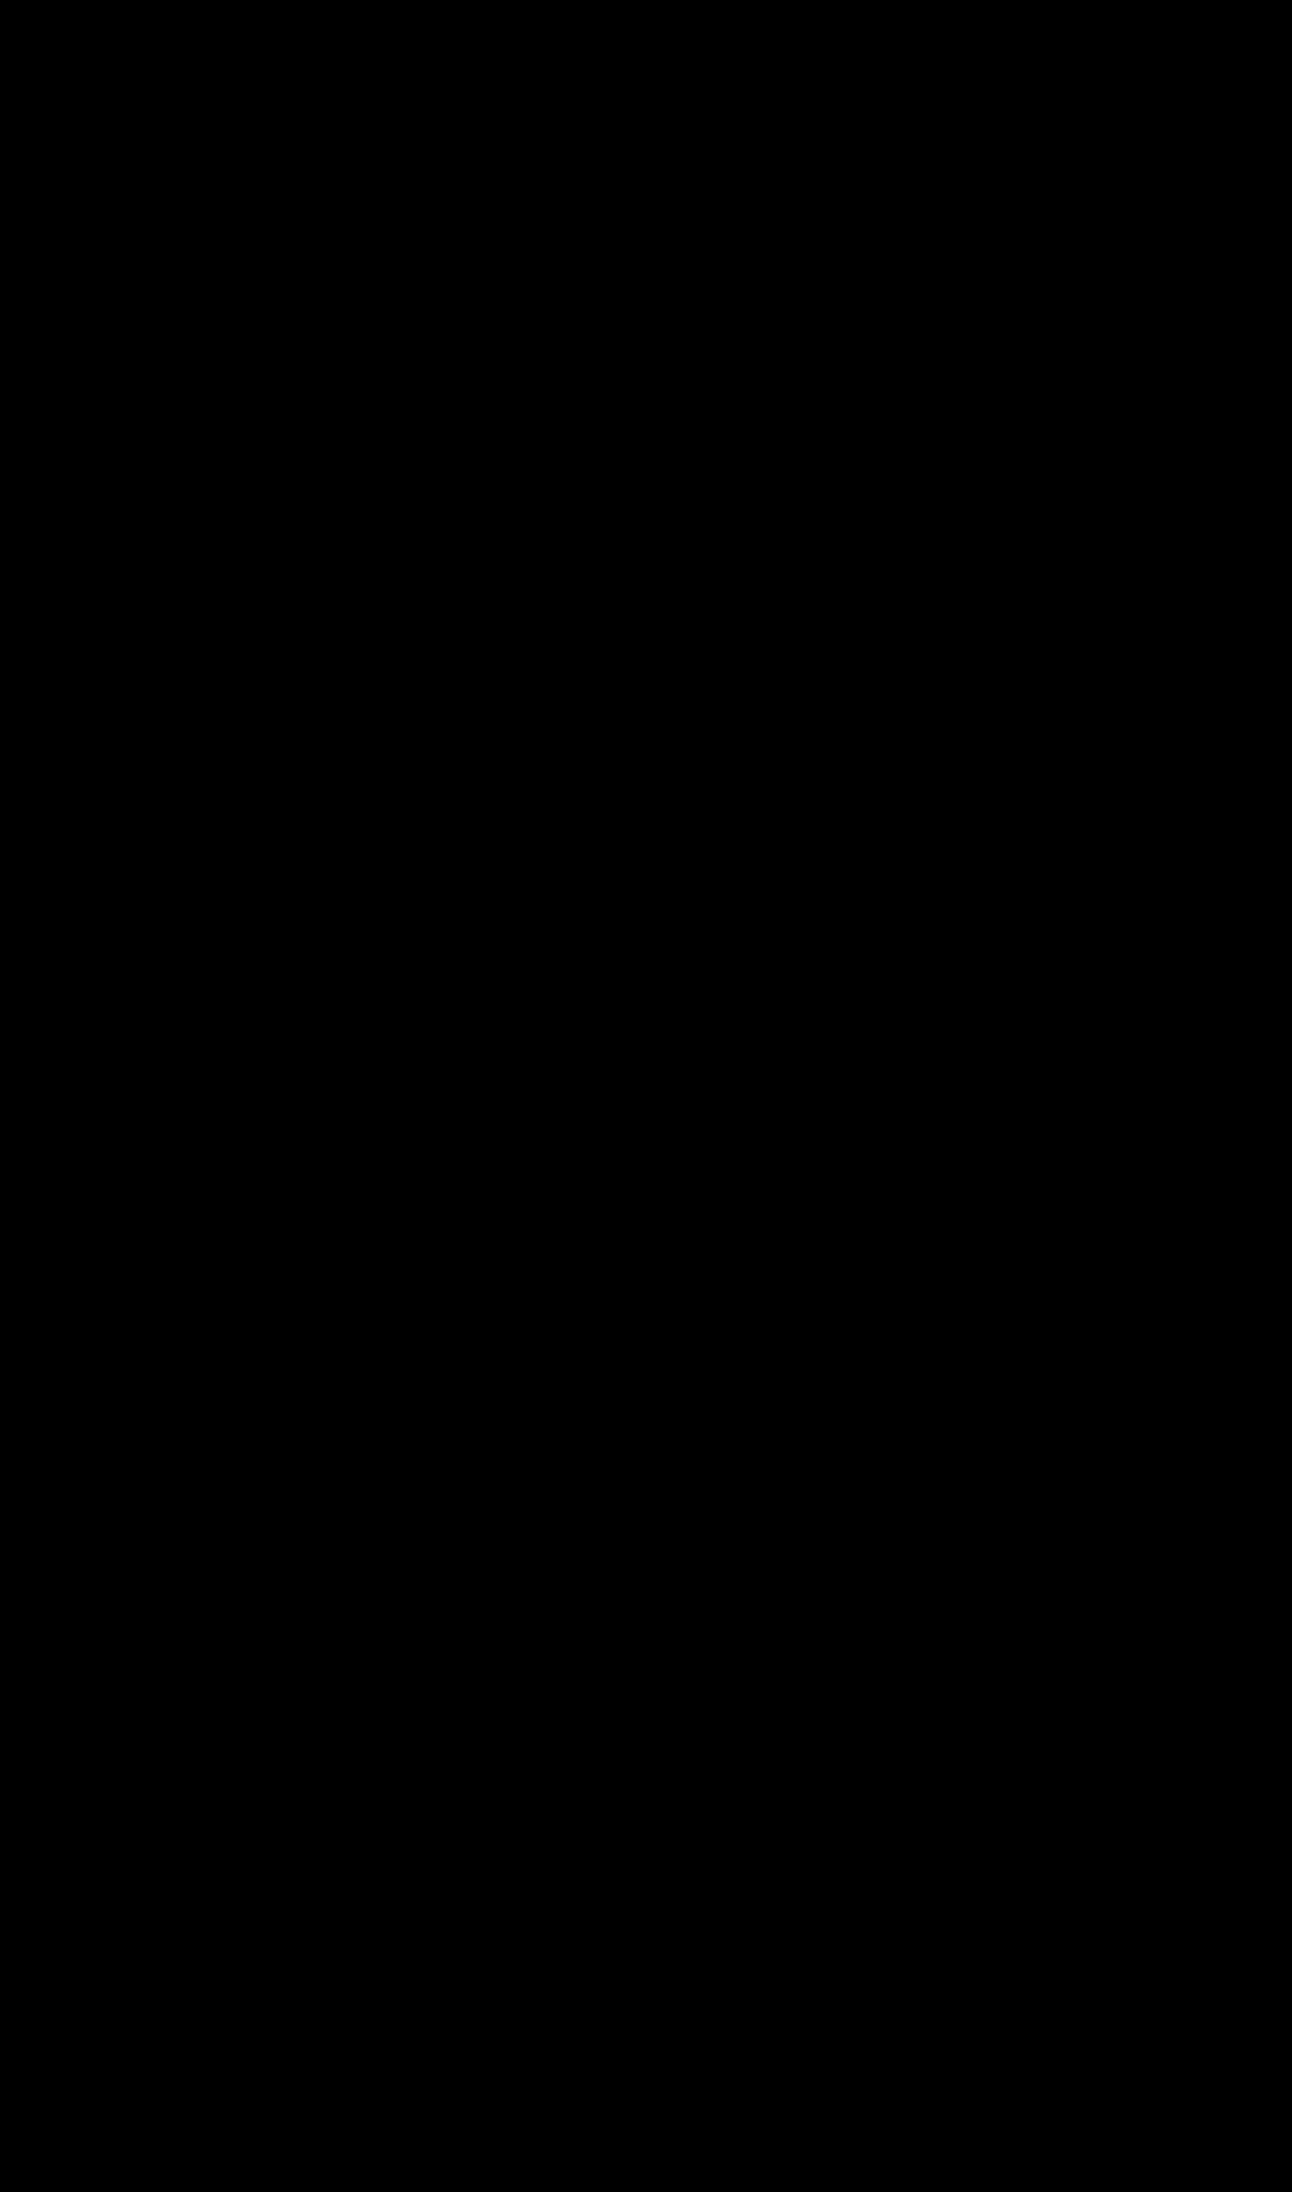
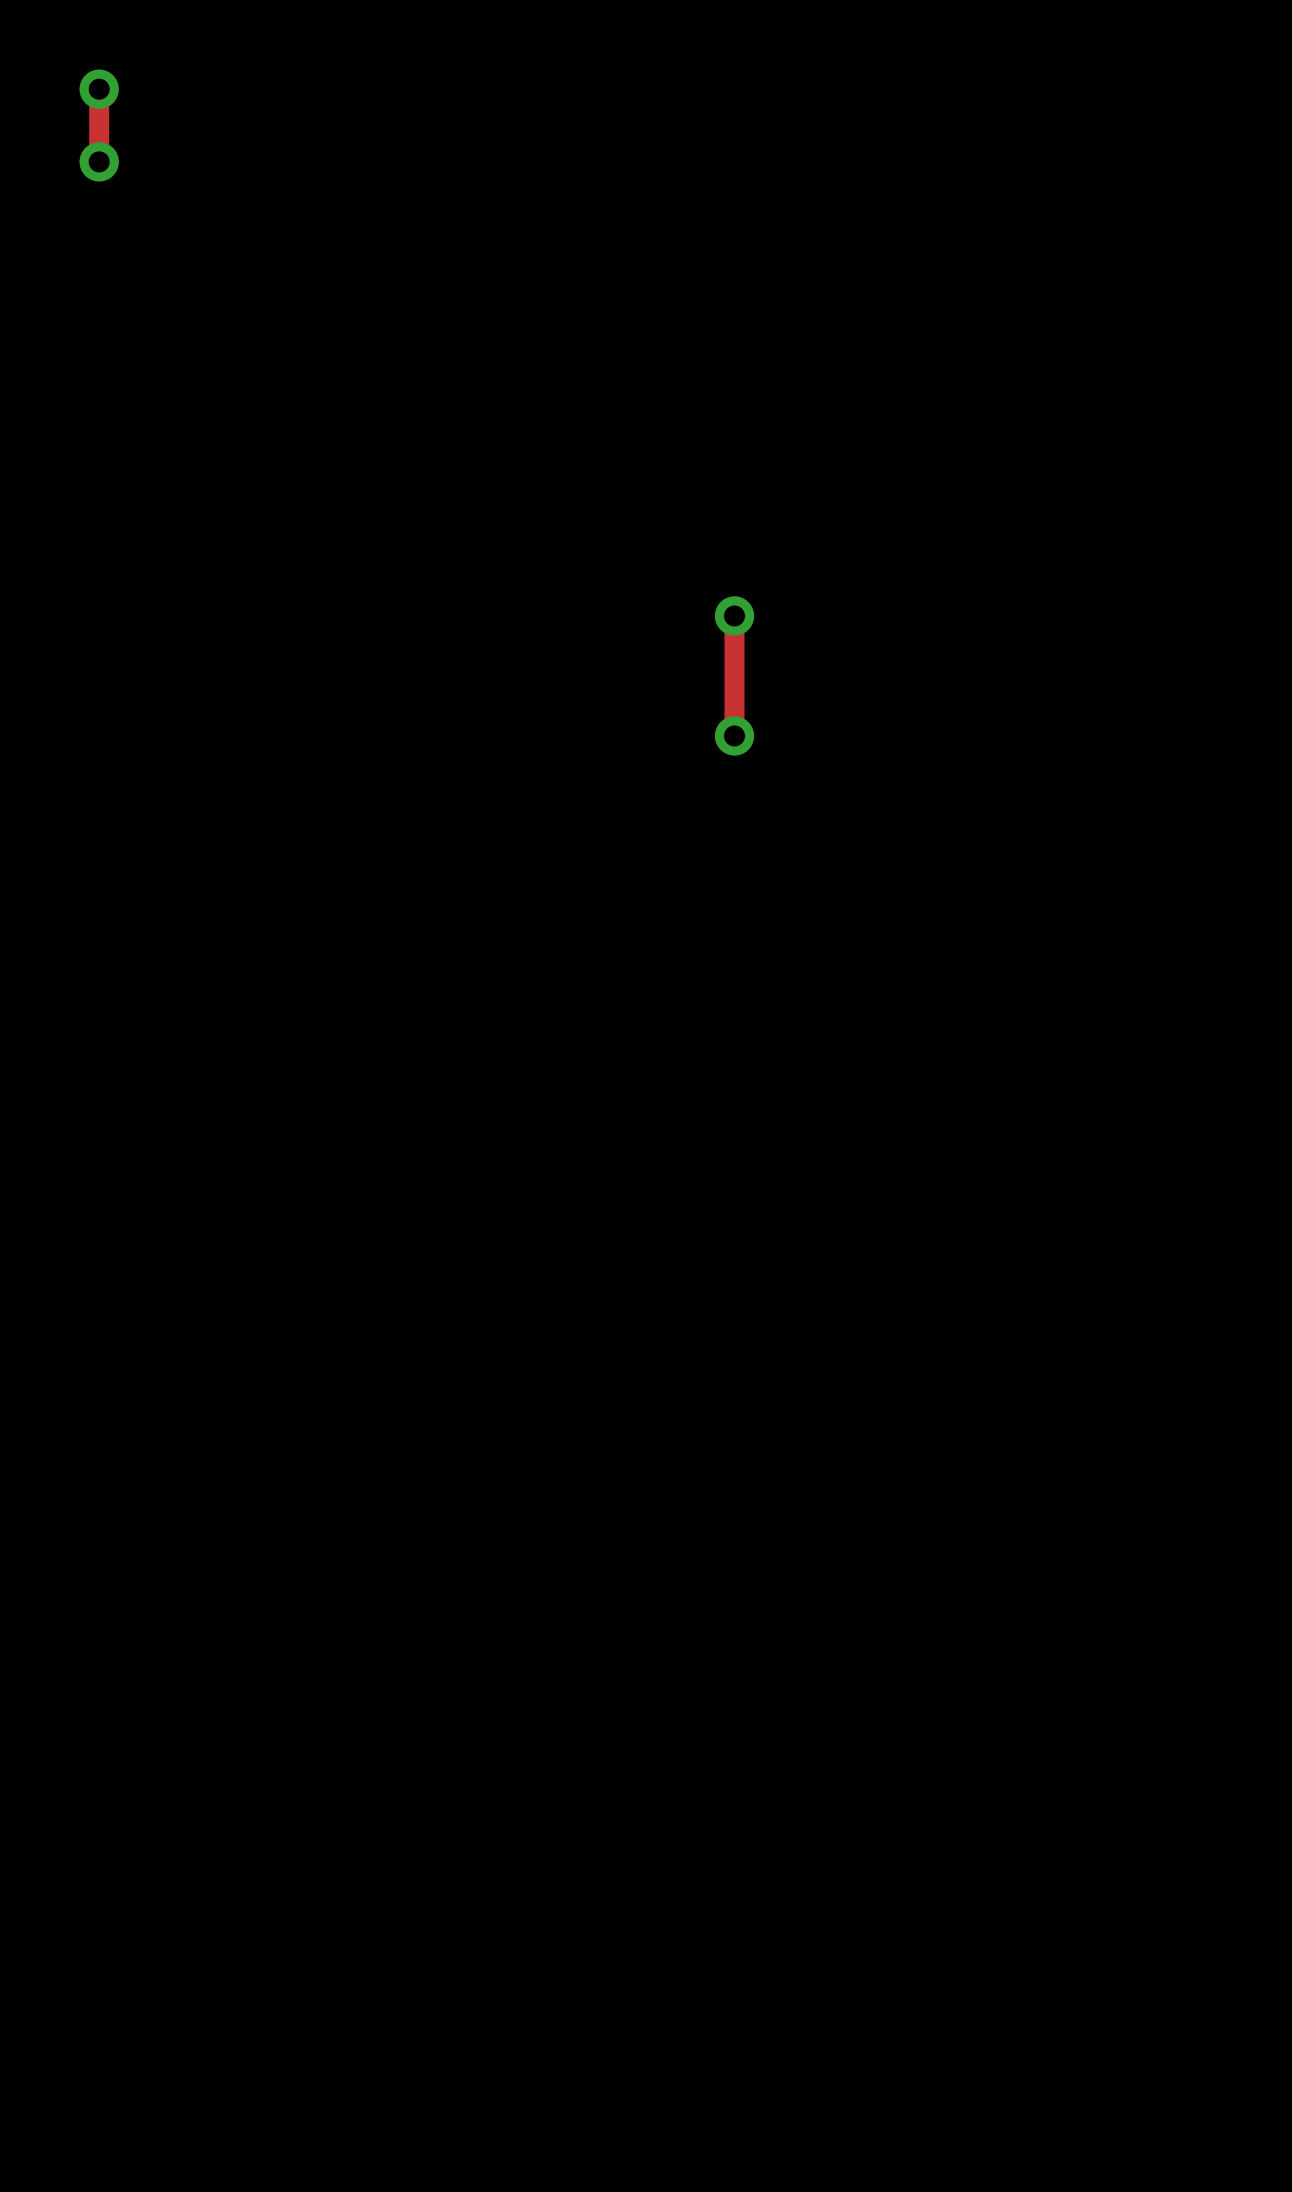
track: none -> (99, 89) (99, 161)
via: none -> (99, 89)
via: none -> (99, 161)
track: none -> (734, 615) (734, 735)
via: none -> (734, 615)
via: none -> (734, 735)

